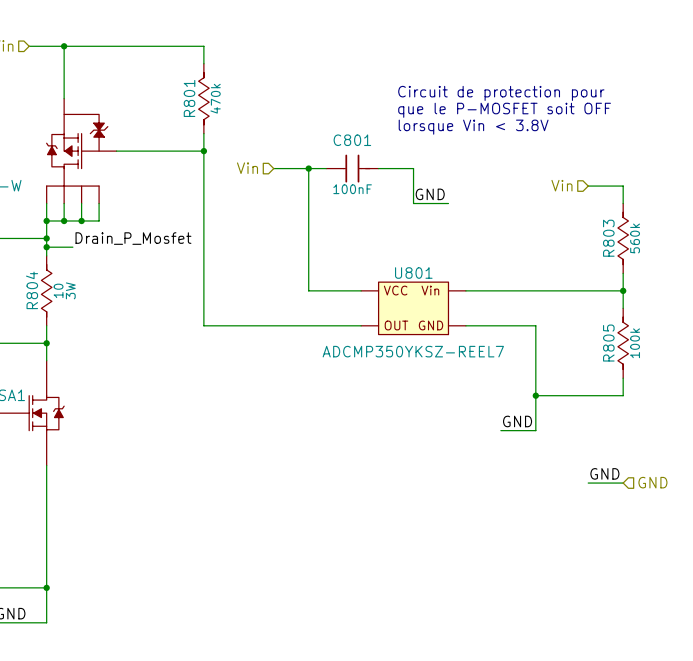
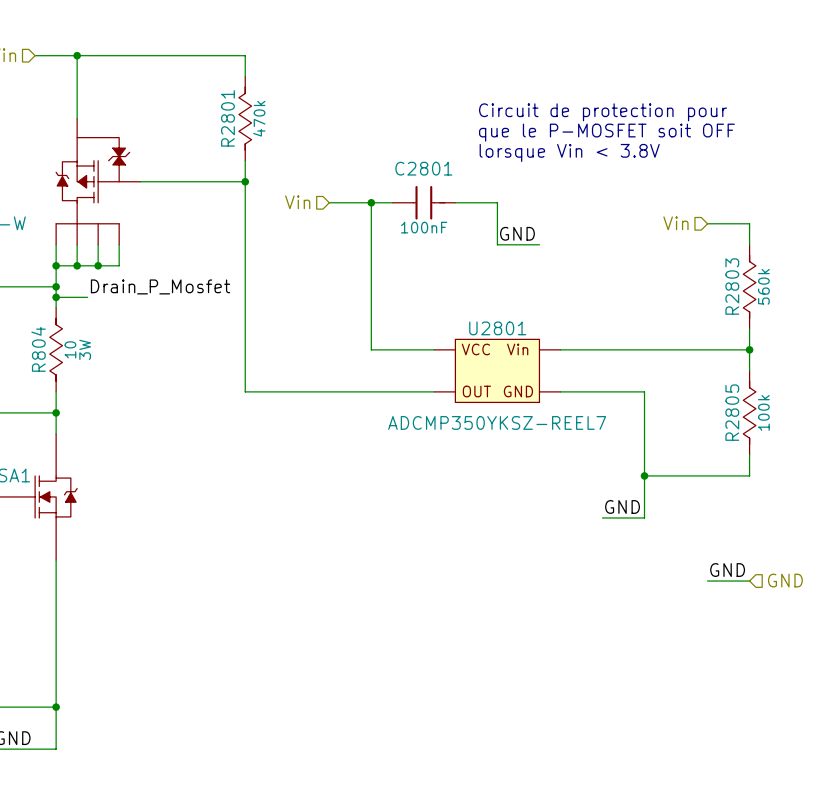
R801 name: R801 (189, 98) -> R2801 (227, 118)
C801 name: C801 (352, 140) -> C2801 (423, 168)
R803 name: R803 (608, 238) -> R2803 (732, 286)
U801 name: U801 (413, 273) -> U2801 (497, 328)
R805 name: R805 (608, 343) -> R2805 (732, 412)

